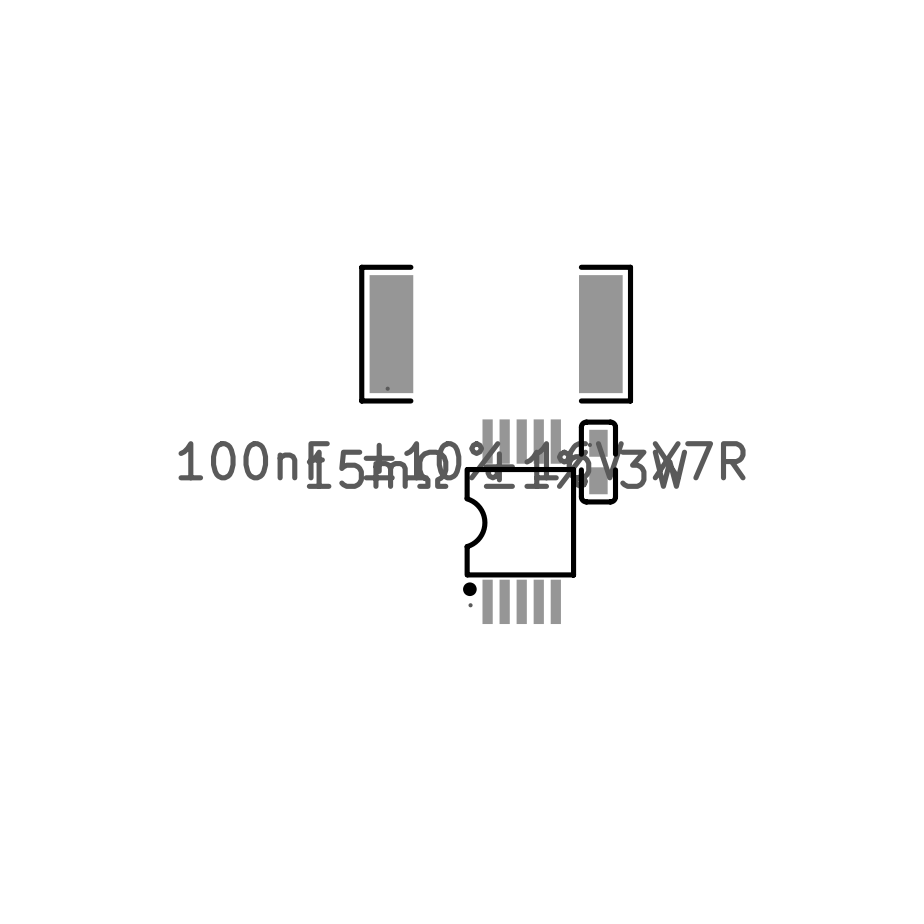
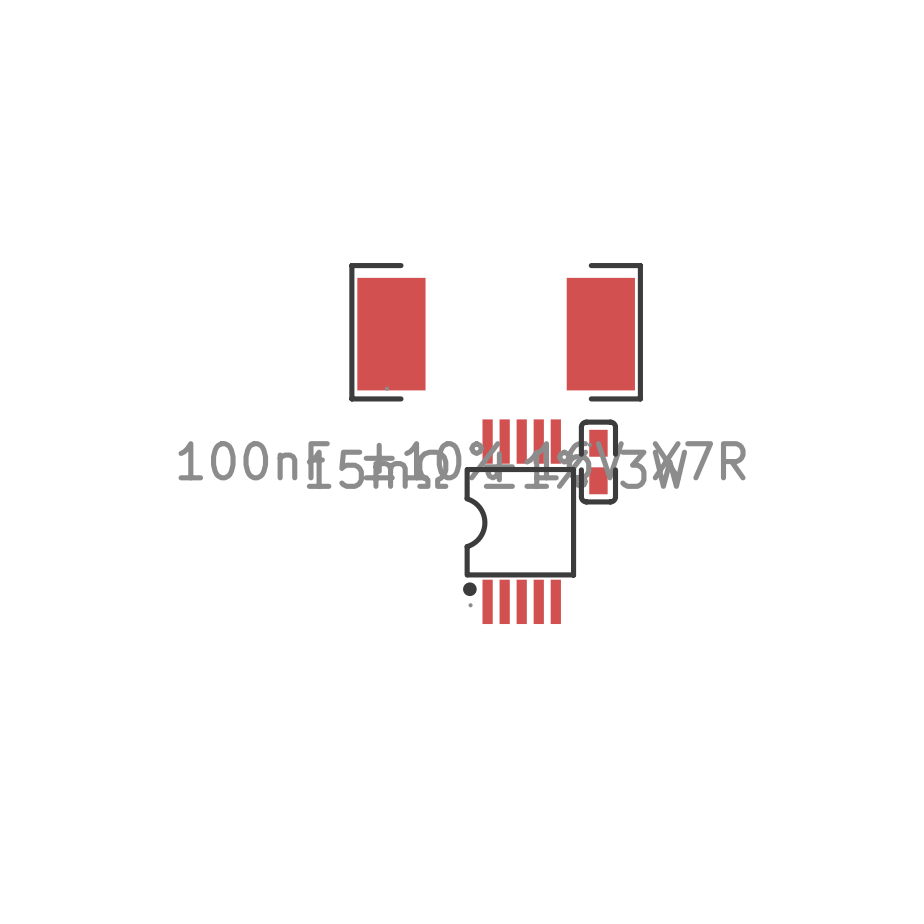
part footprint: [359, 264, 634, 404] -> [349, 263, 643, 402]

